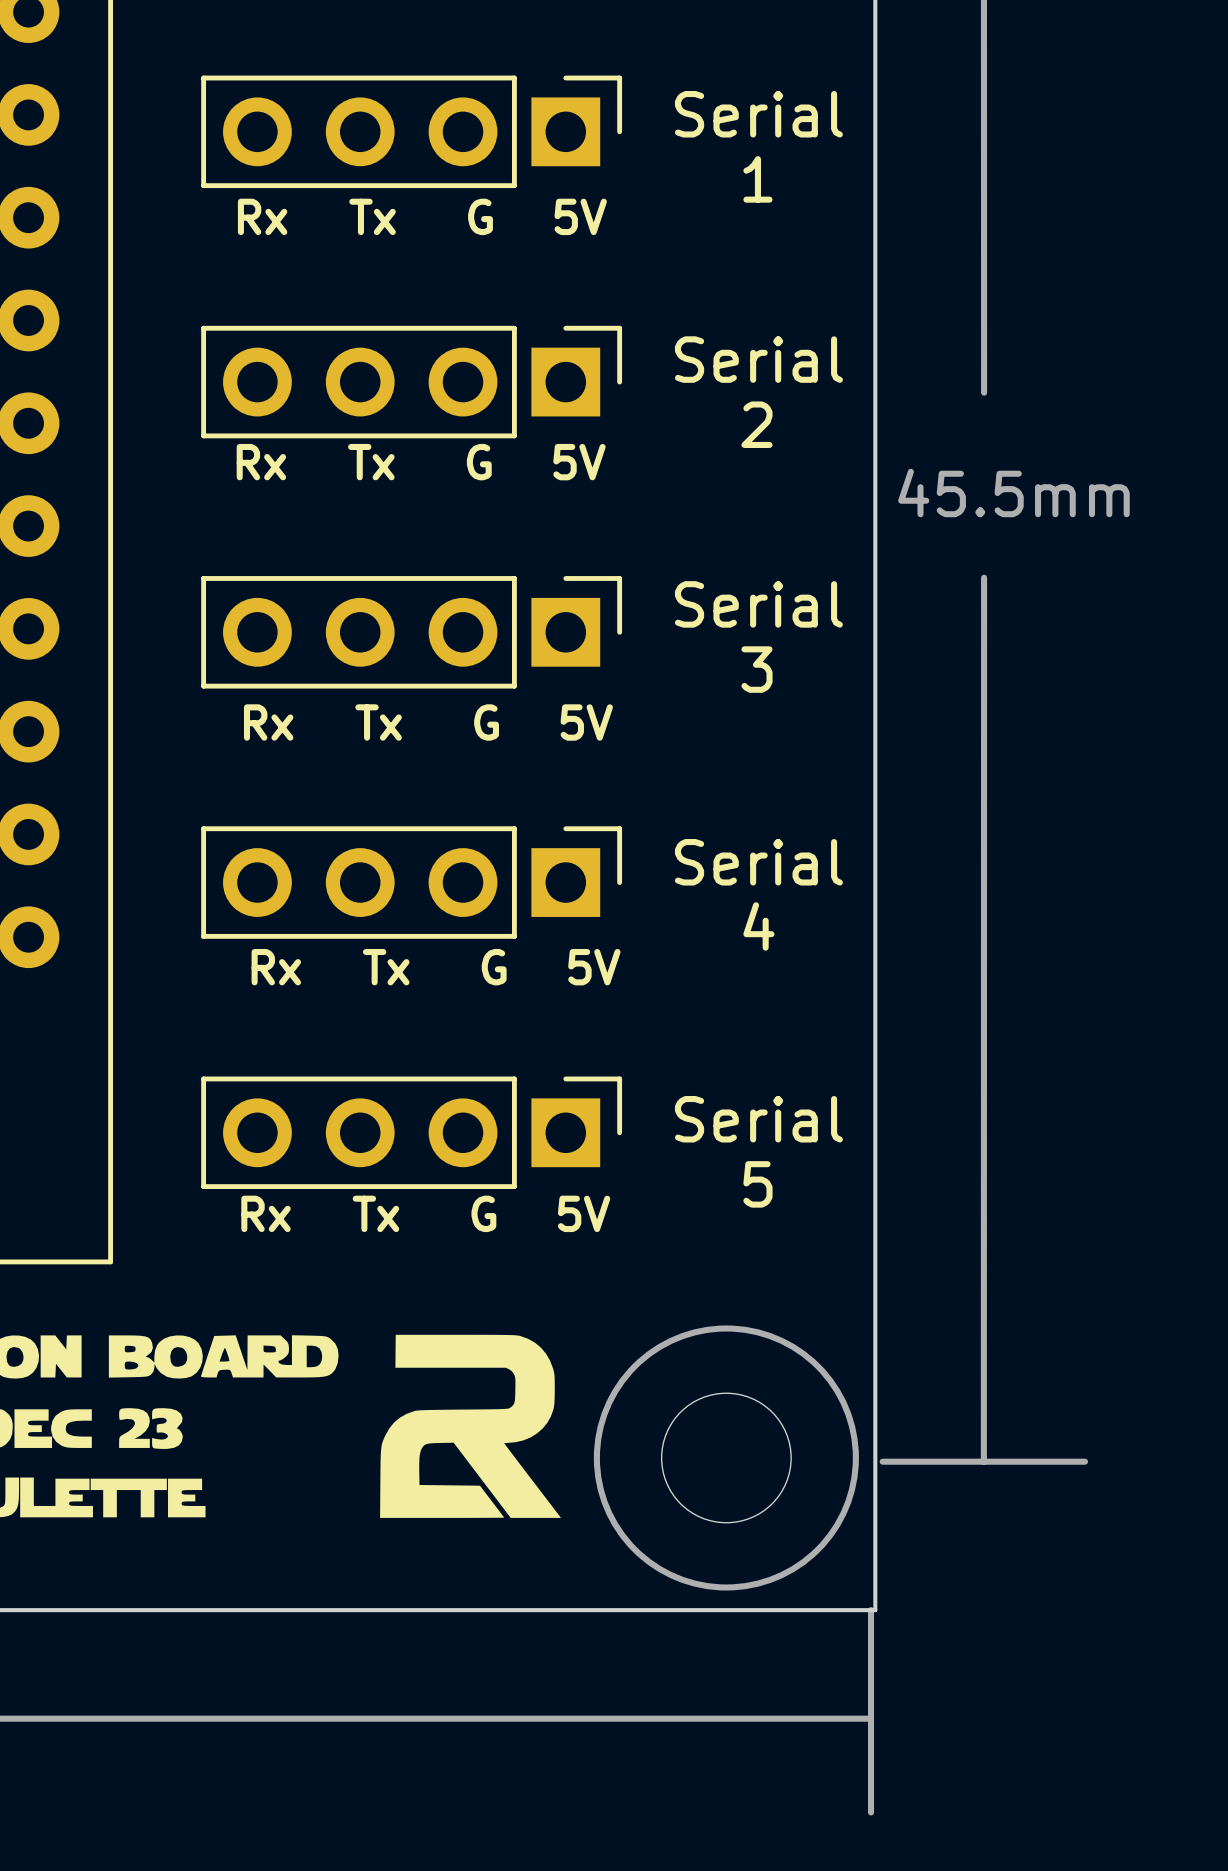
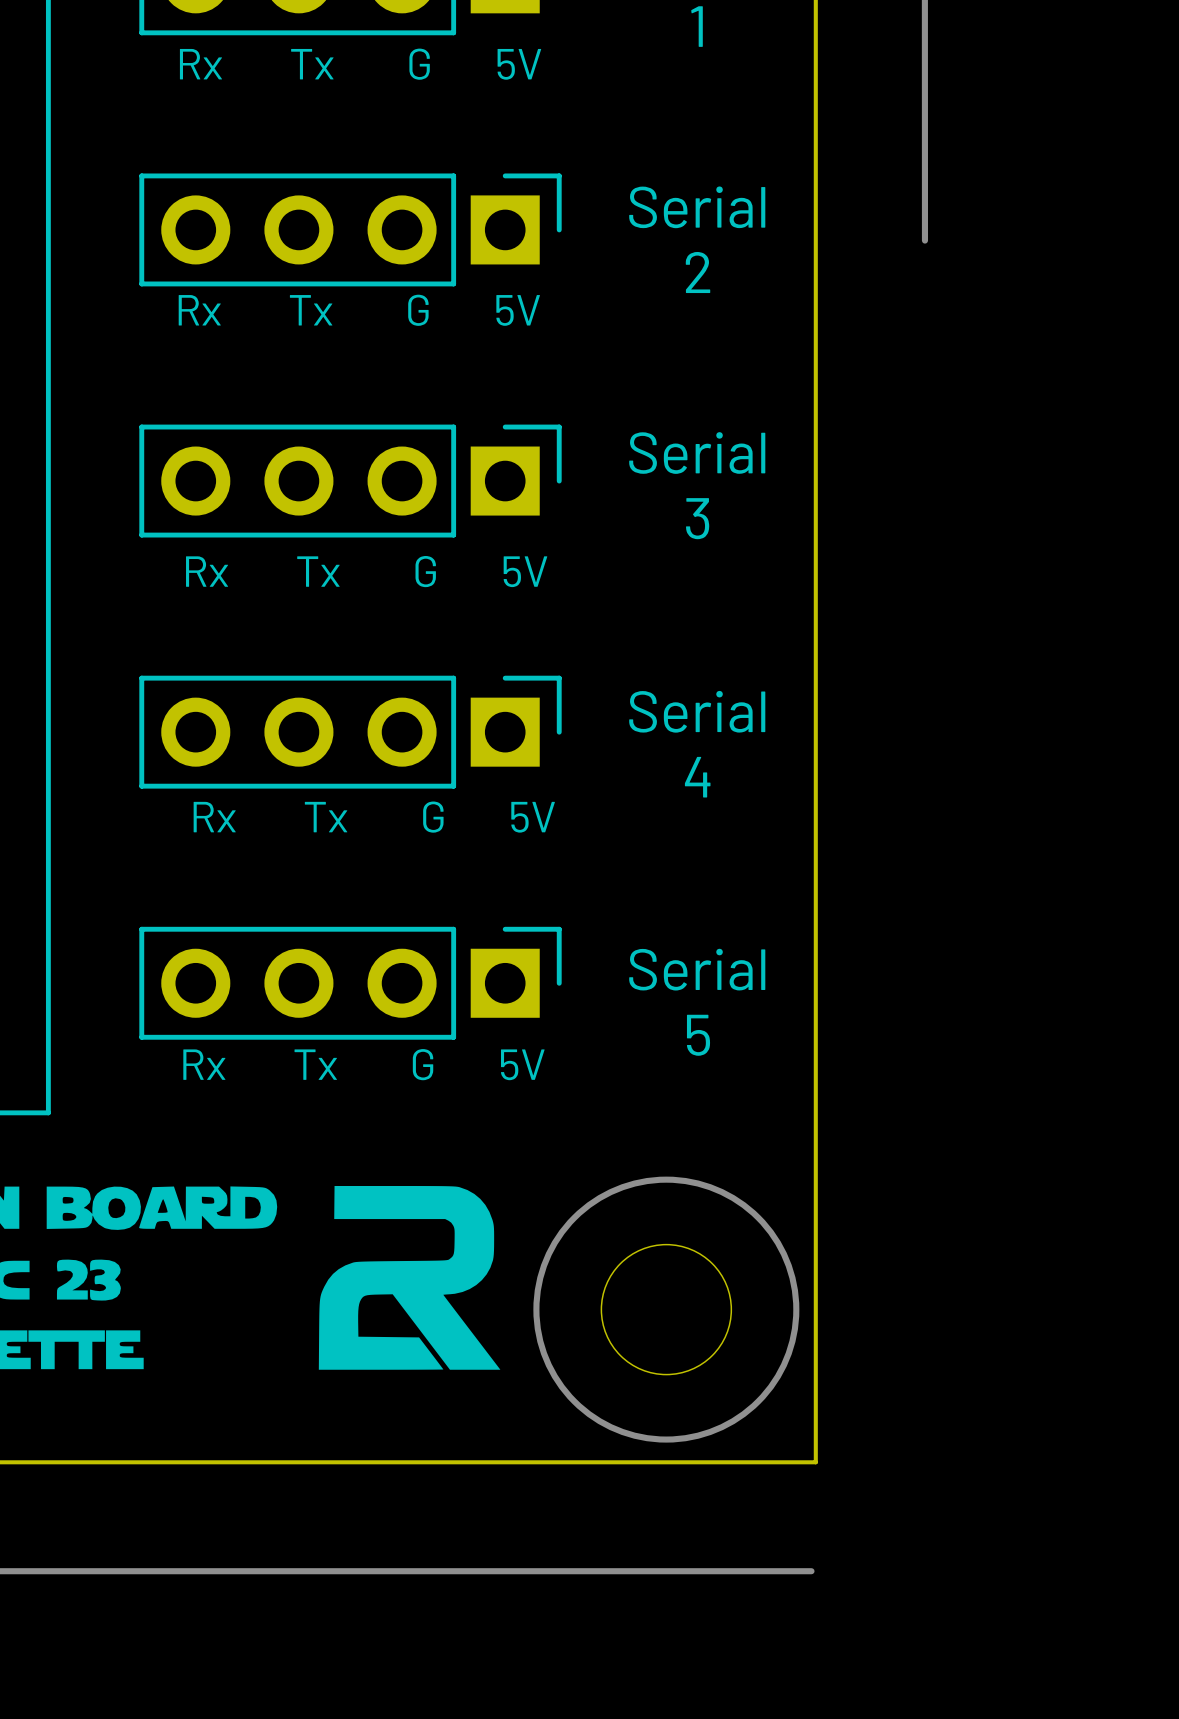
text: 45.5mm (1013, 493) -> none
line: (984, 577) (983, 1461) -> none
line: (882, 1461) (1085, 1461) -> none
line: (871, 1610) (871, 1812) -> none

